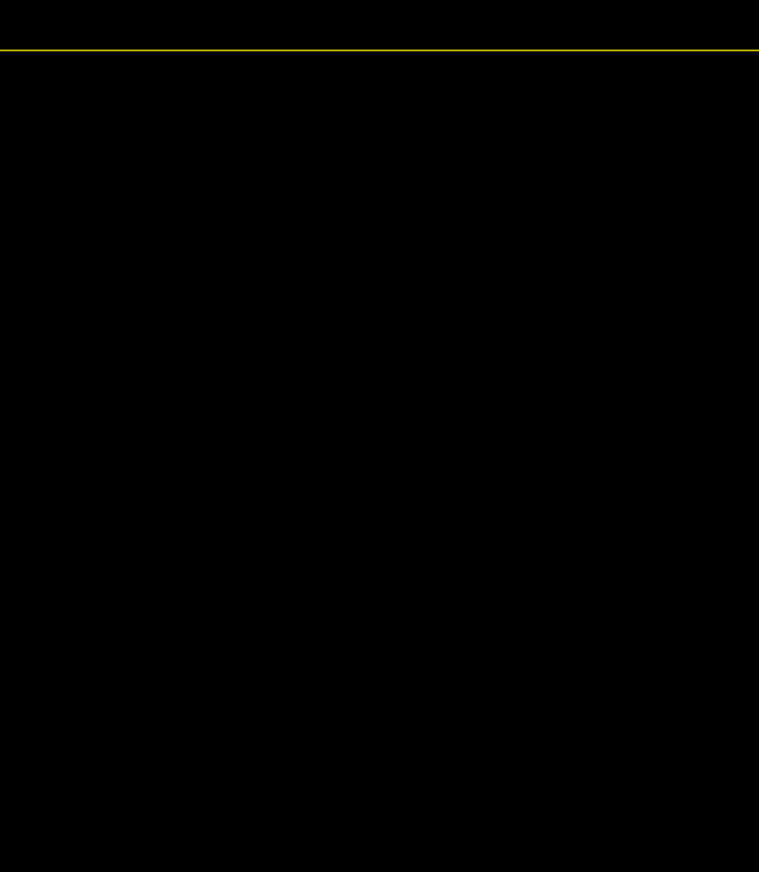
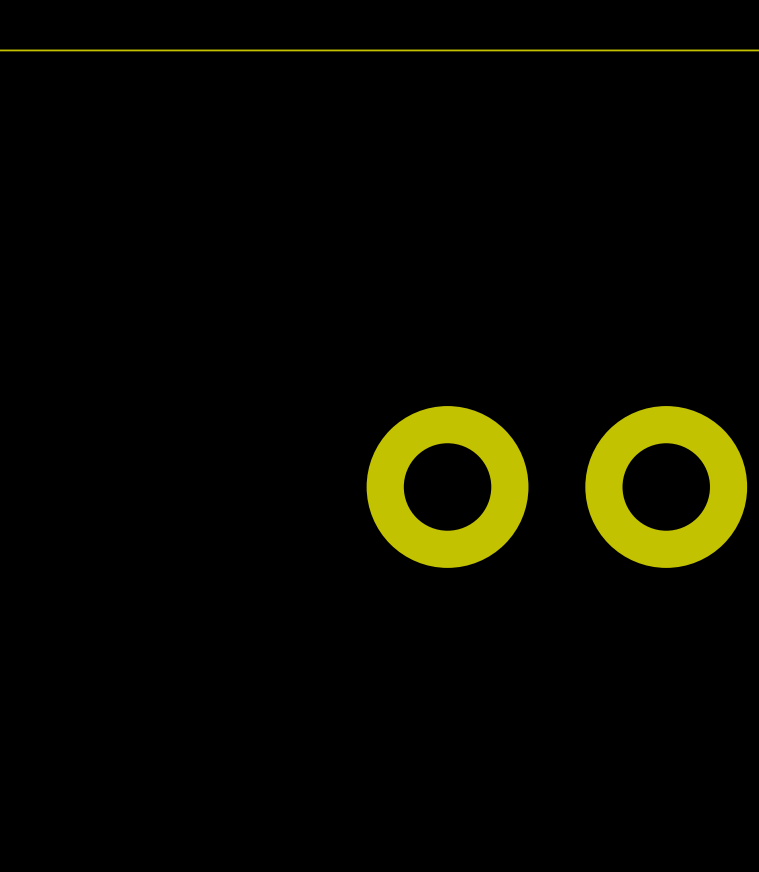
part: none -> (556, 486)

